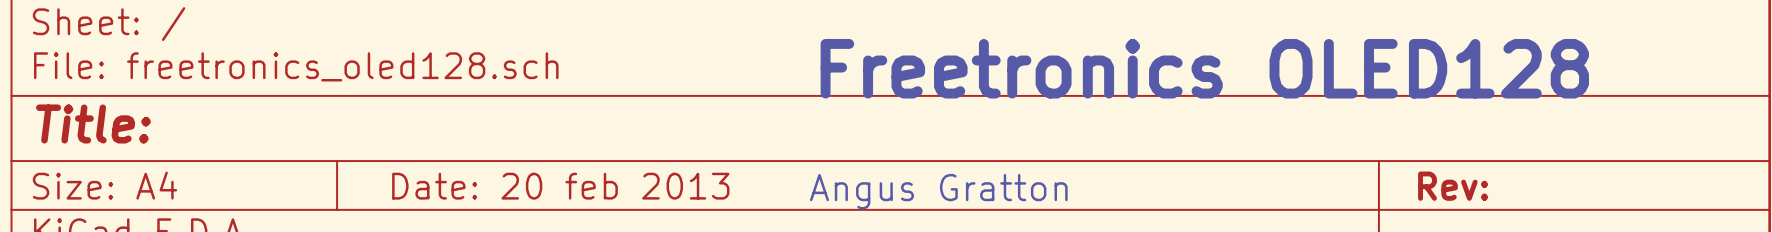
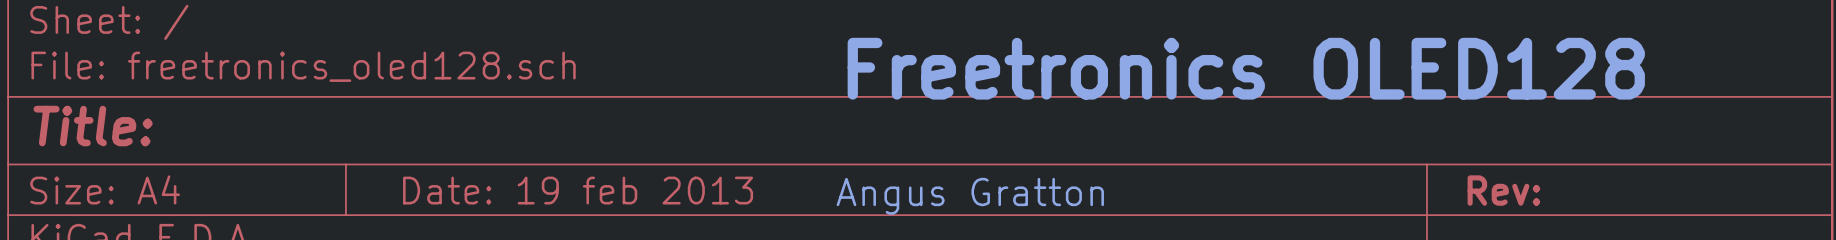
title block: Date: 20 feb 2013 (560, 186) -> Date: 19 feb 2013 (578, 190)

